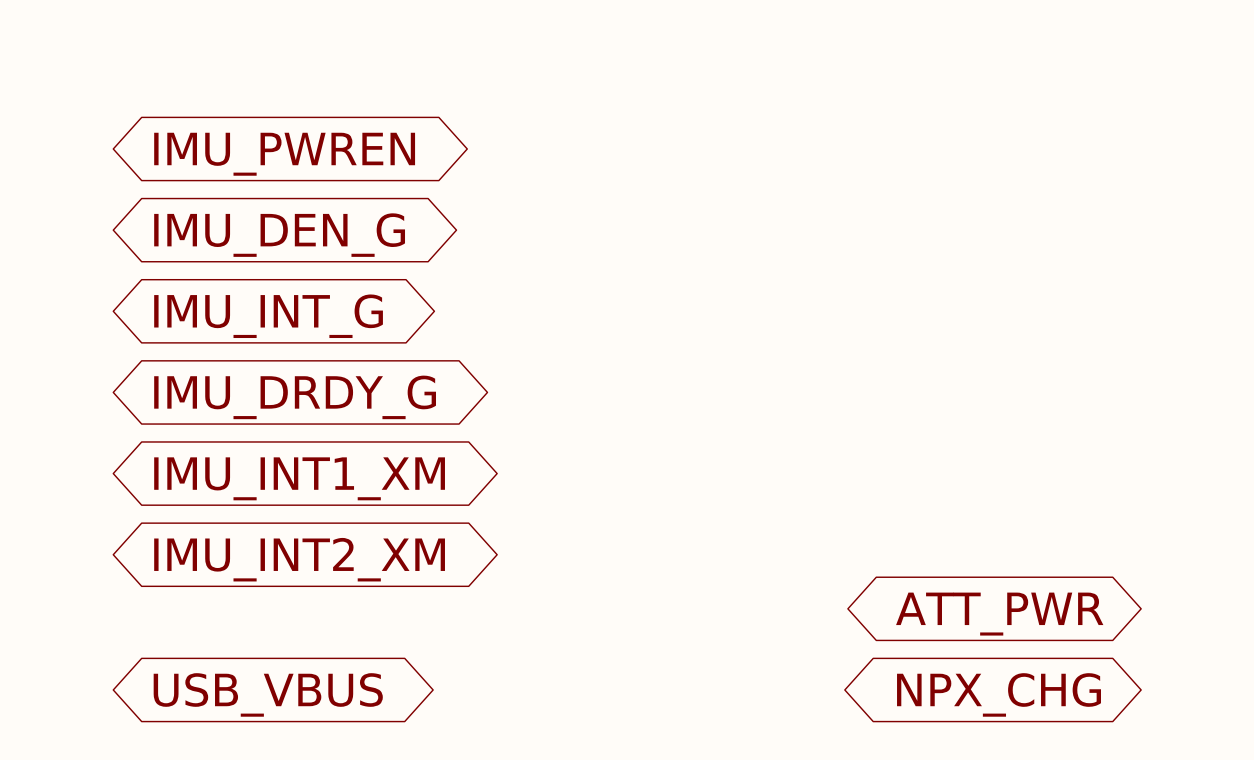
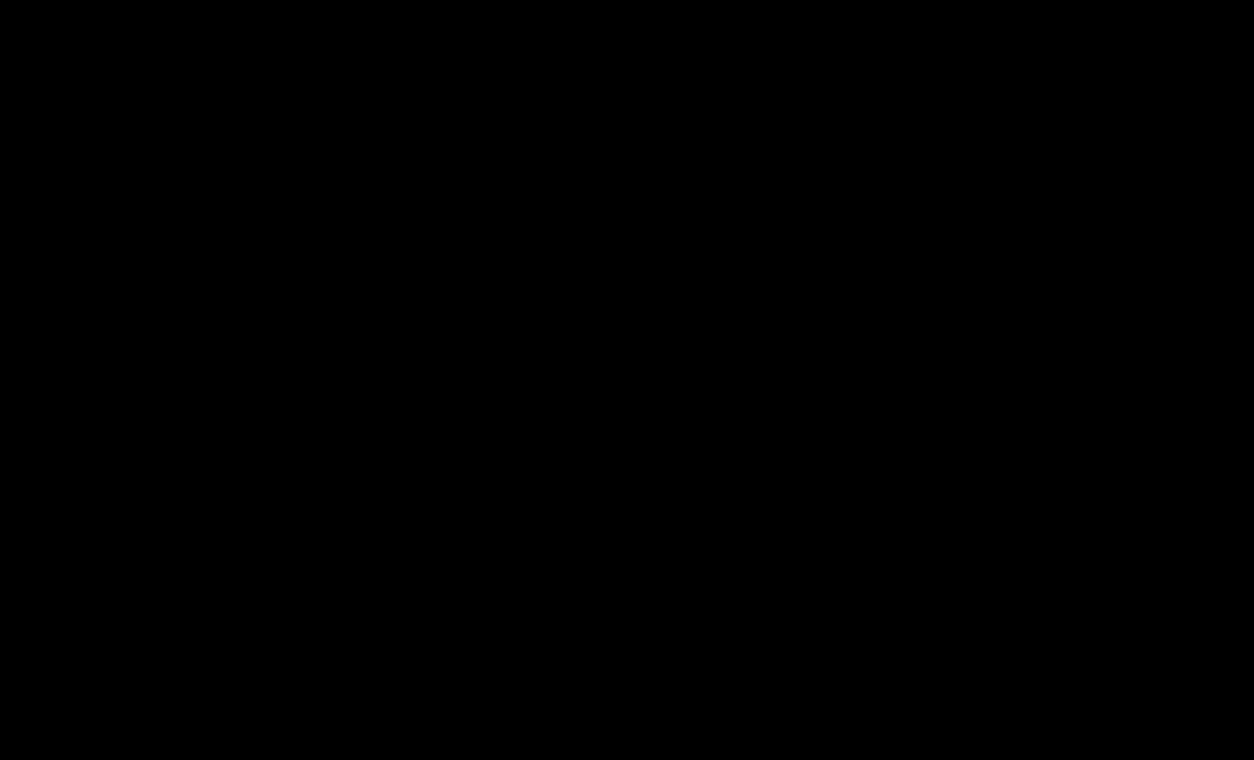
global label: IMU_PWREN (284, 154) -> none
global label: IMU_DEN_G (279, 235) -> none
global label: IMU_INT_G (268, 316) -> none
global label: IMU_DRDY_G (295, 397) -> none
global label: IMU_INT1_XM (299, 478) -> none
global label: IMU_INT2_XM (299, 559) -> none
global label: ATT_PWR (999, 614) -> none
global label: USB_VBUS (268, 694) -> none
global label: NPX_CHG (999, 694) -> none

